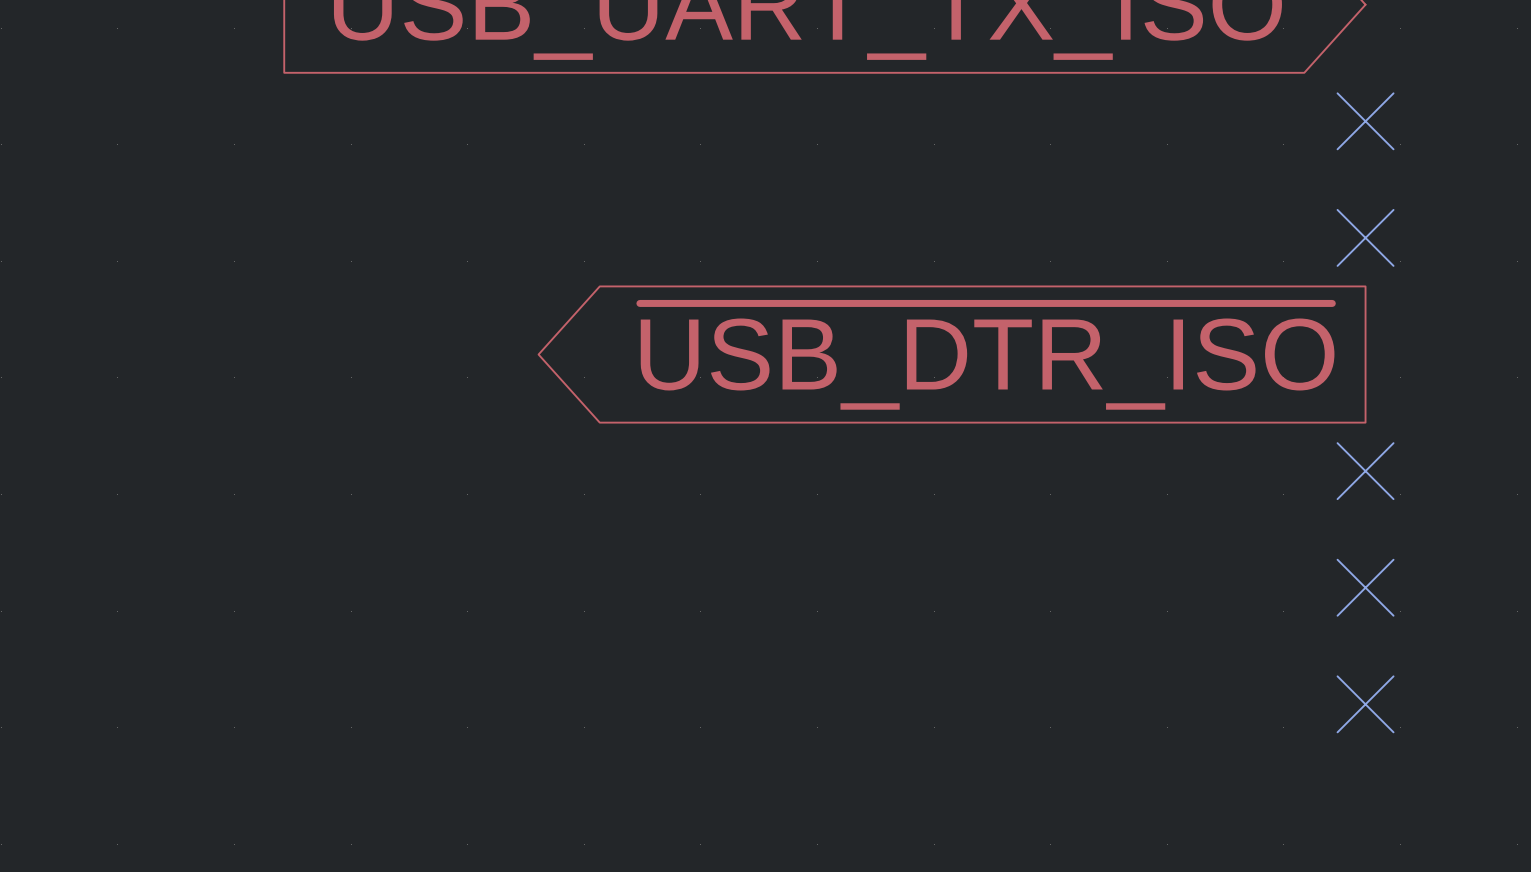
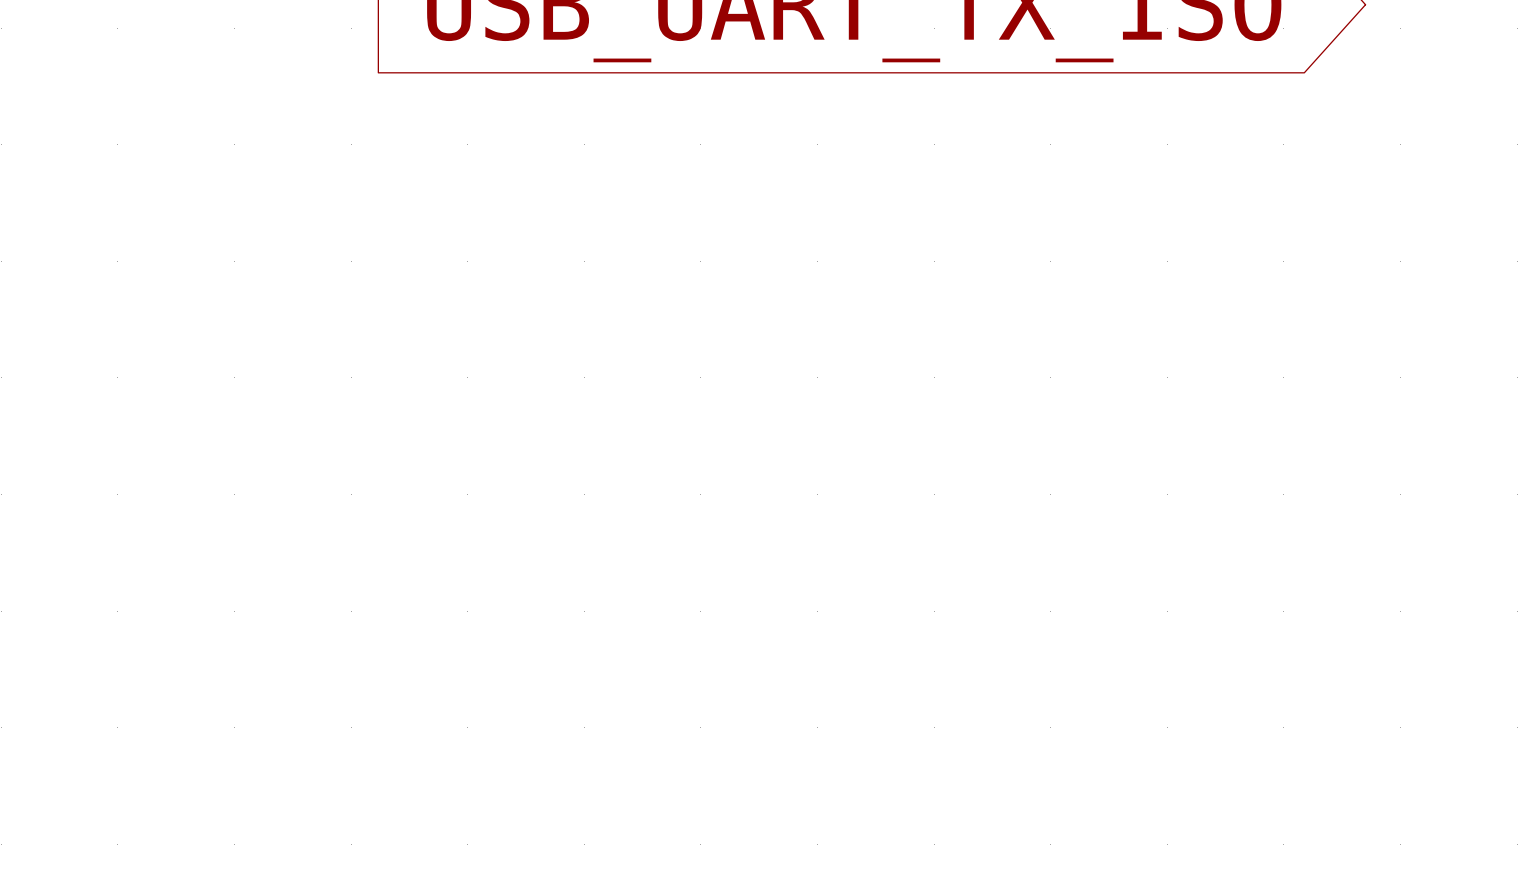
no-connect mark: (1365, 121) -> none
no-connect mark: (1365, 237) -> none
global label: ~{USB_DTR_ISO} (987, 356) -> none
no-connect mark: (1365, 471) -> none
no-connect mark: (1365, 587) -> none
no-connect mark: (1365, 704) -> none

